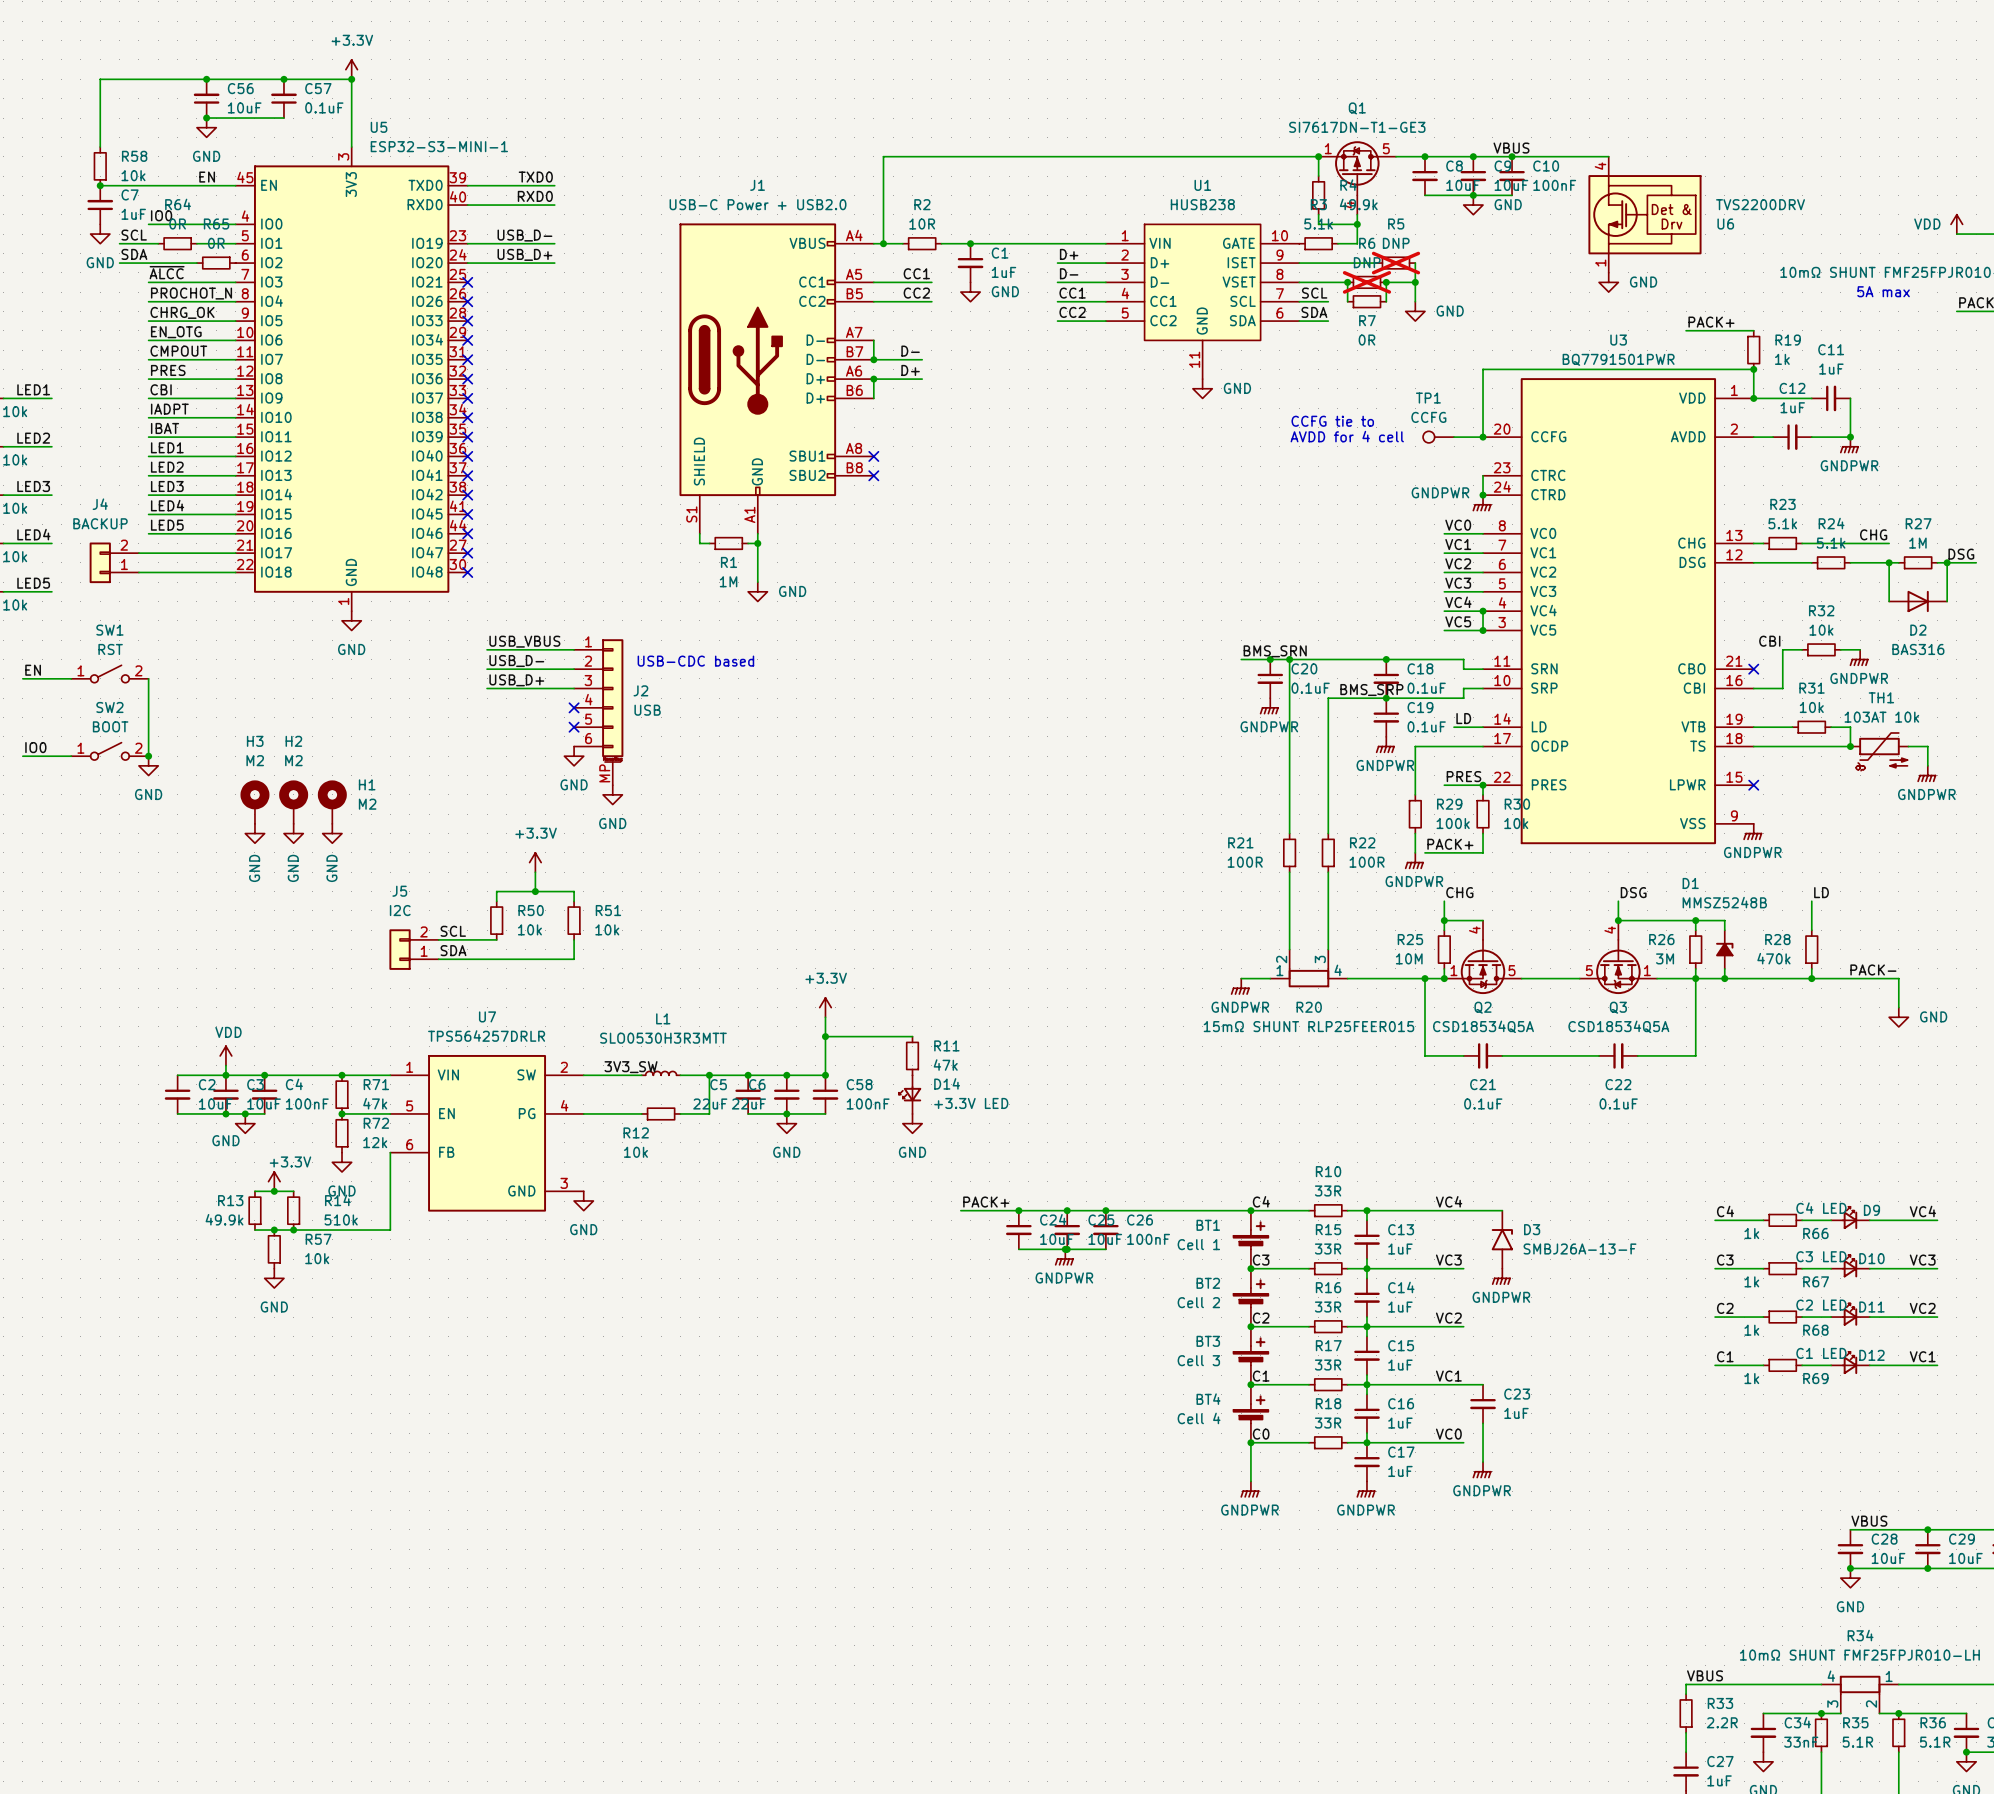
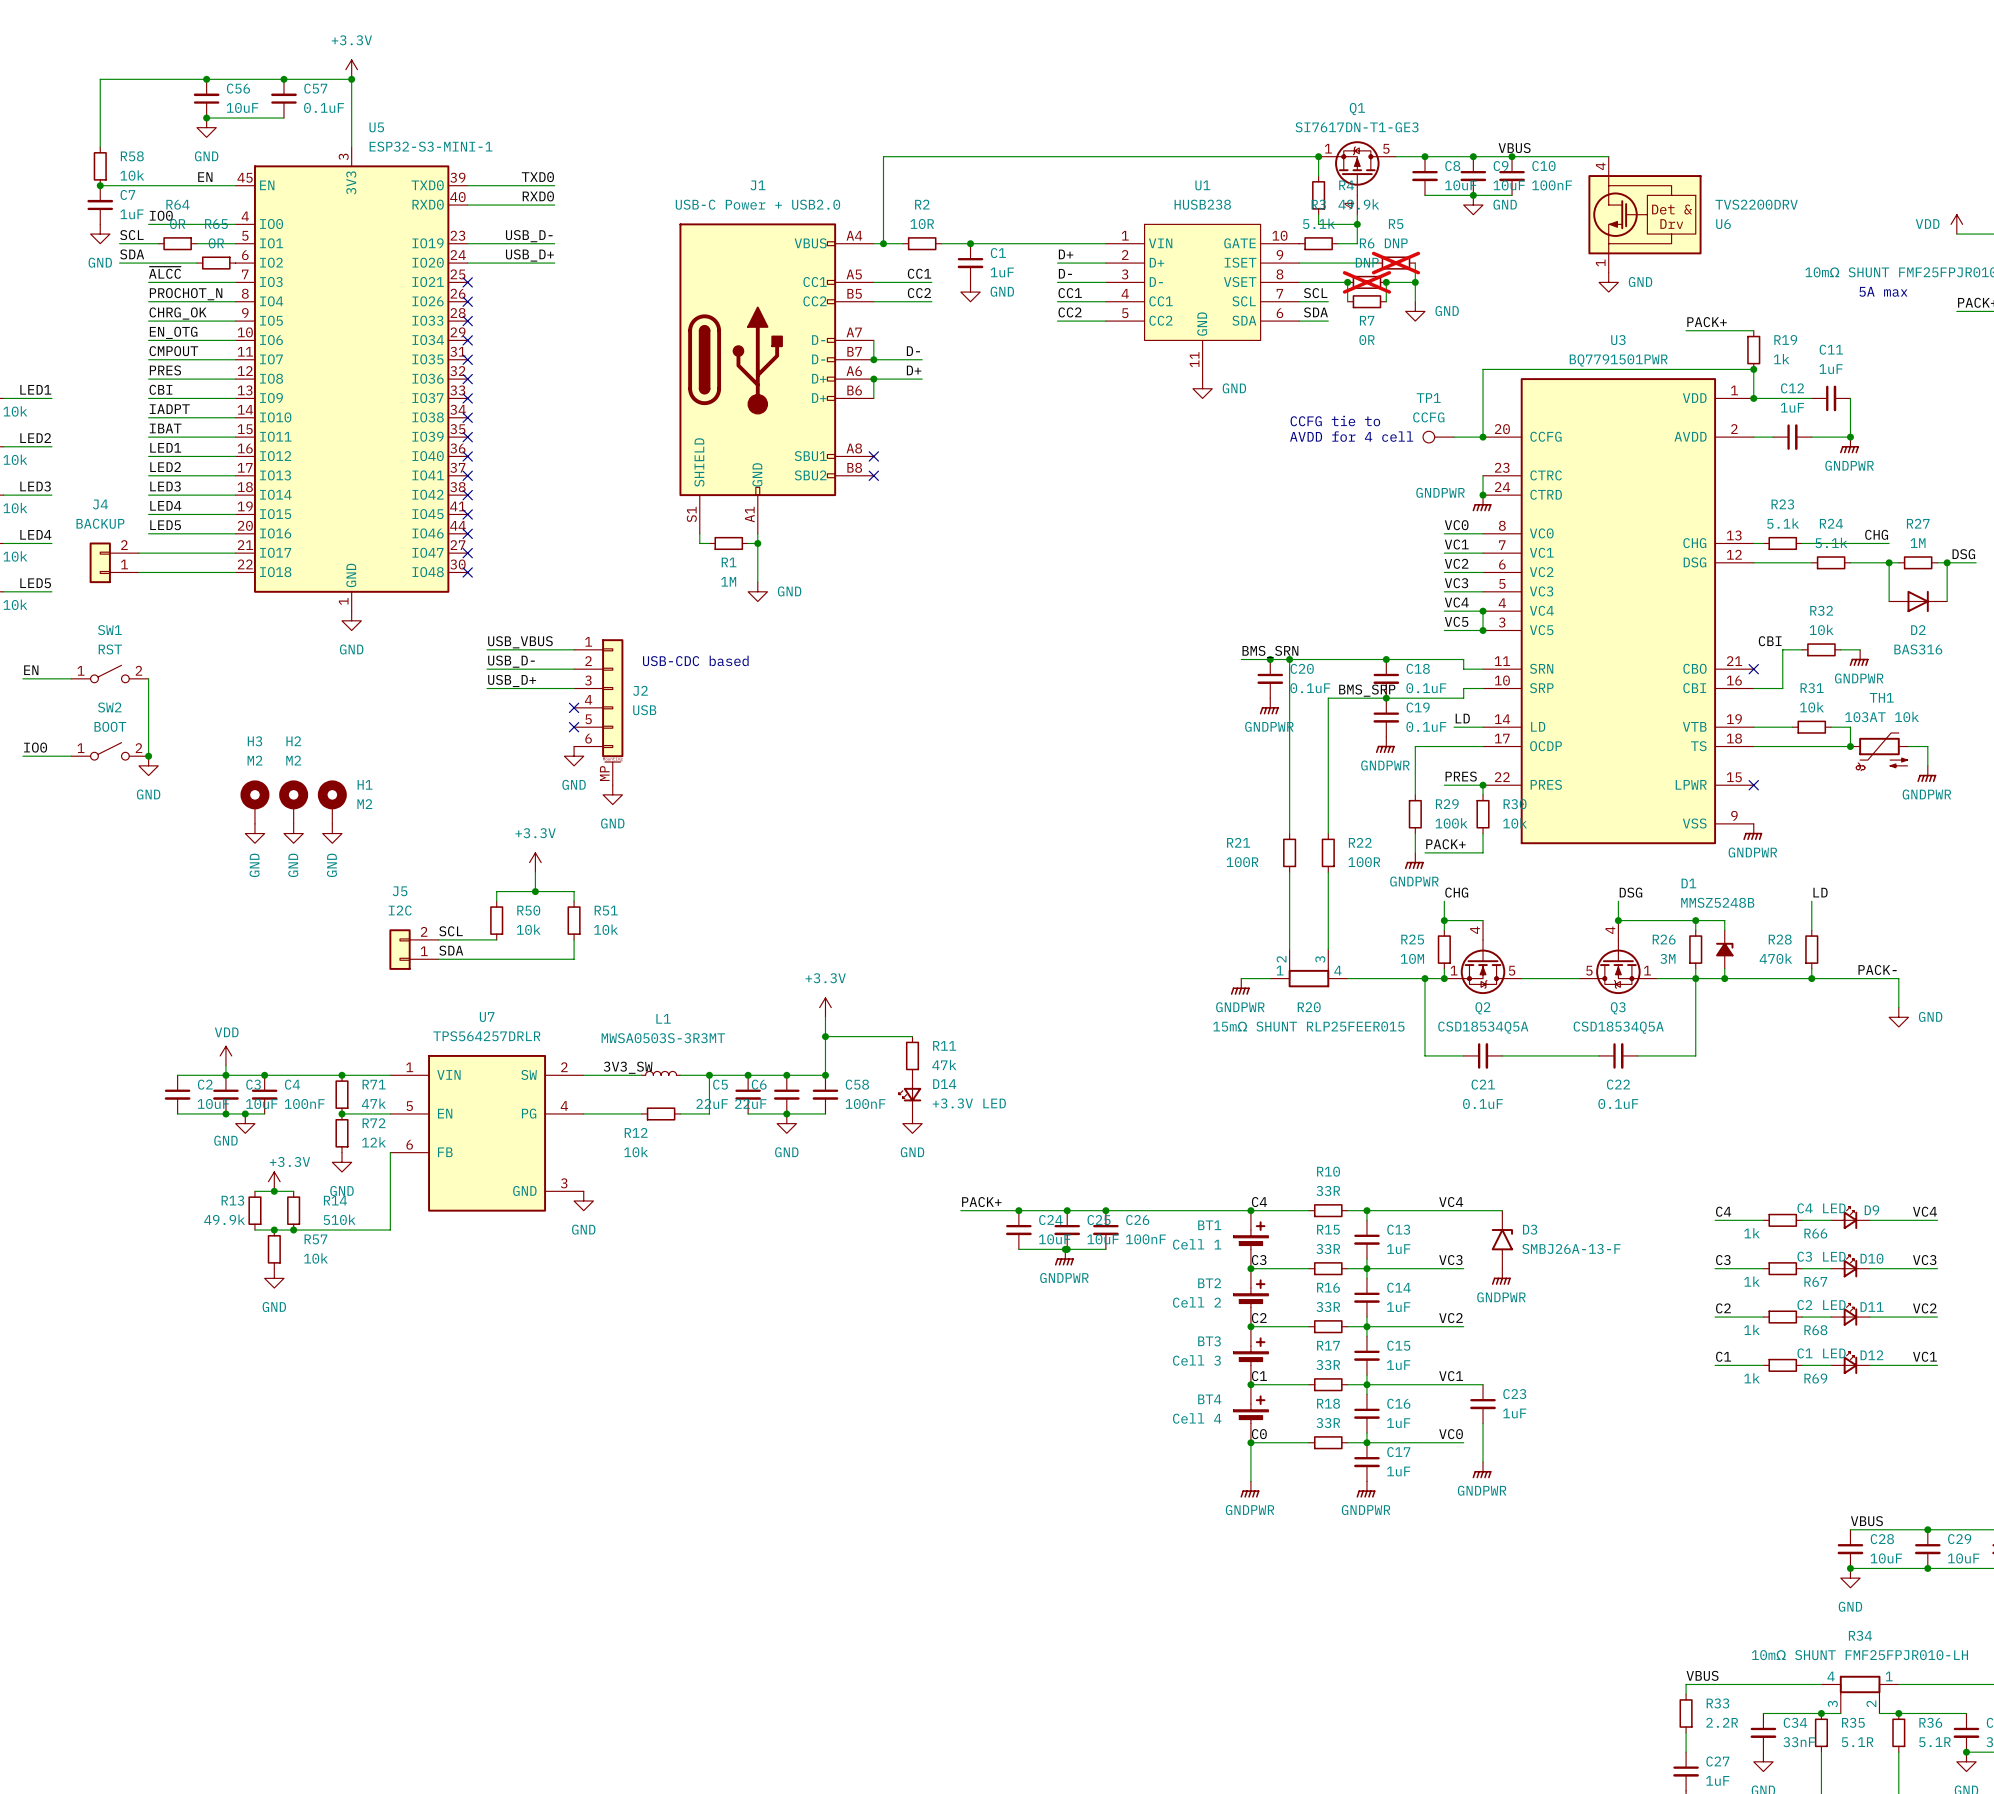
L1 value: SLO0530H3R3MTT (663, 1038) -> MWSA0503S-3R3MT (663, 1038)

